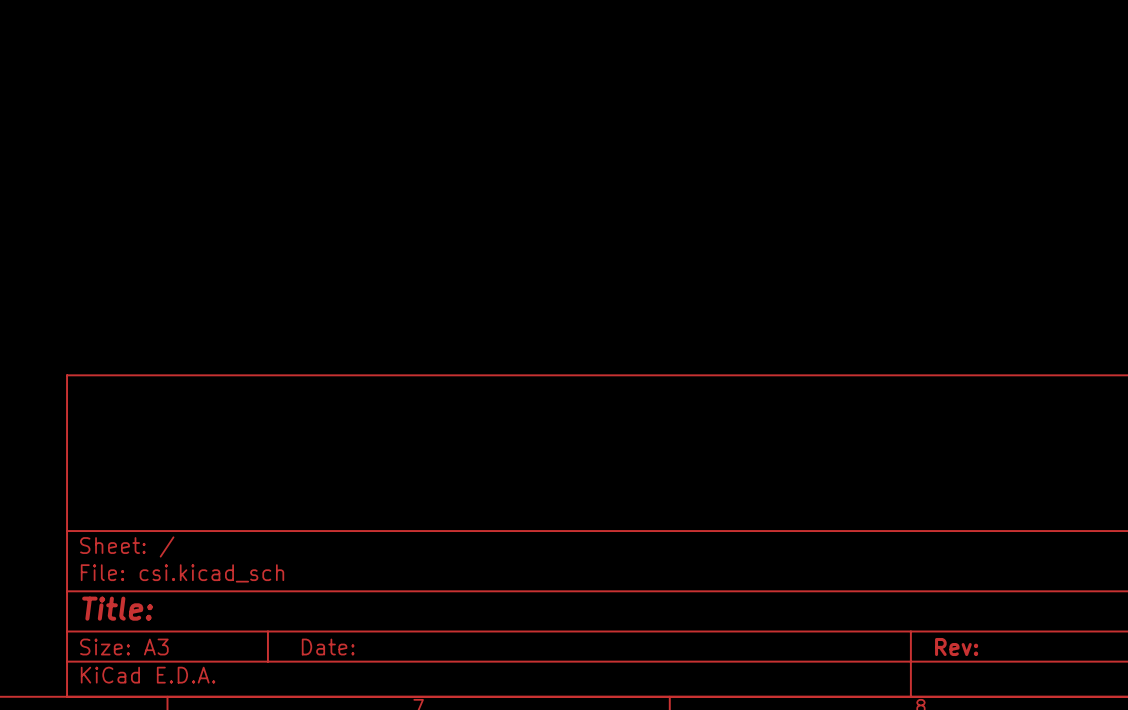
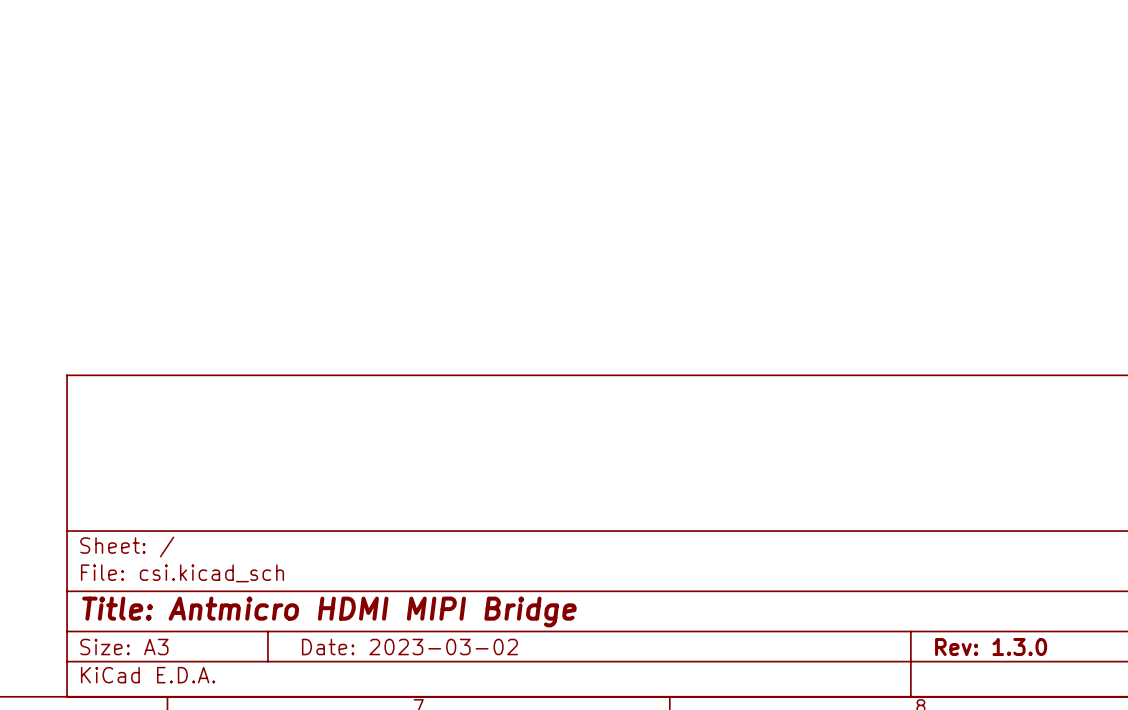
title block: Title: (117, 608) -> Title: Antmicro HDMI MIPI Bridge (329, 611)
title block: Date: (328, 647) -> Date: 2023-03-02 (409, 647)
title block: Rev: (956, 647) -> Rev: 1.3.0 (991, 647)

